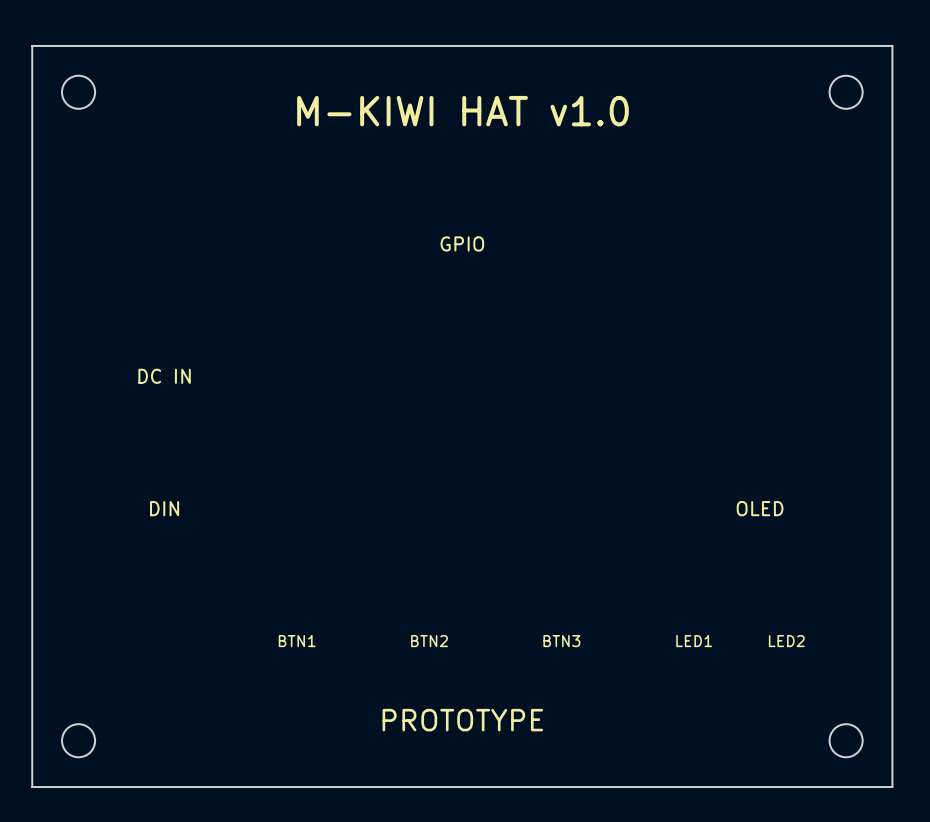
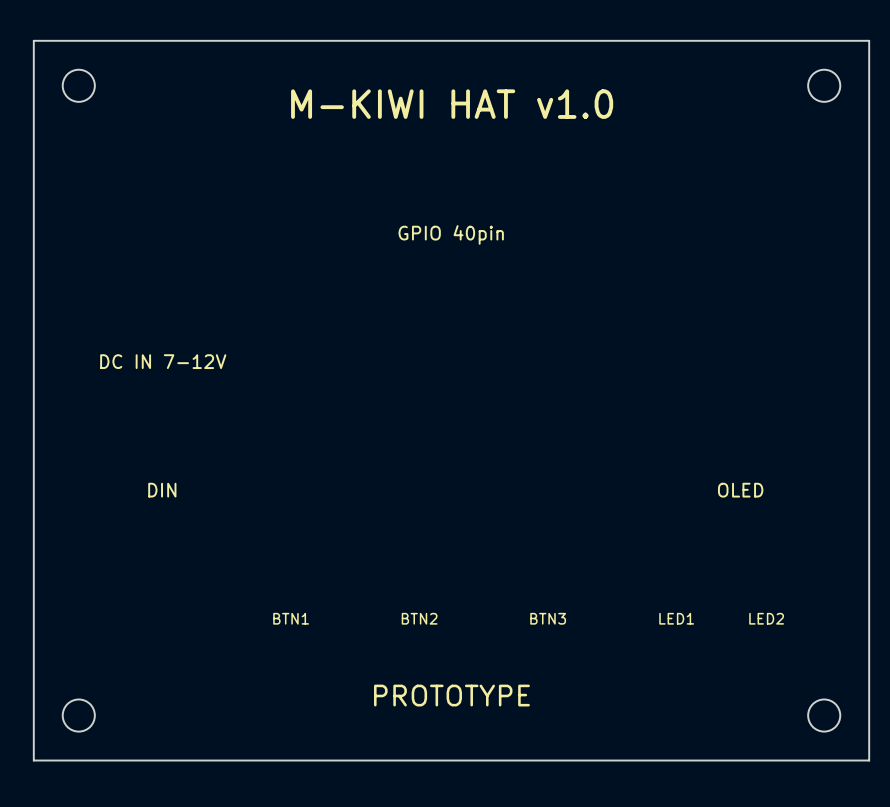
text: GPIO (462, 243) -> GPIO 40pin (451, 234)
text: DC IN (164, 376) -> DC IN 7-12V (163, 361)

